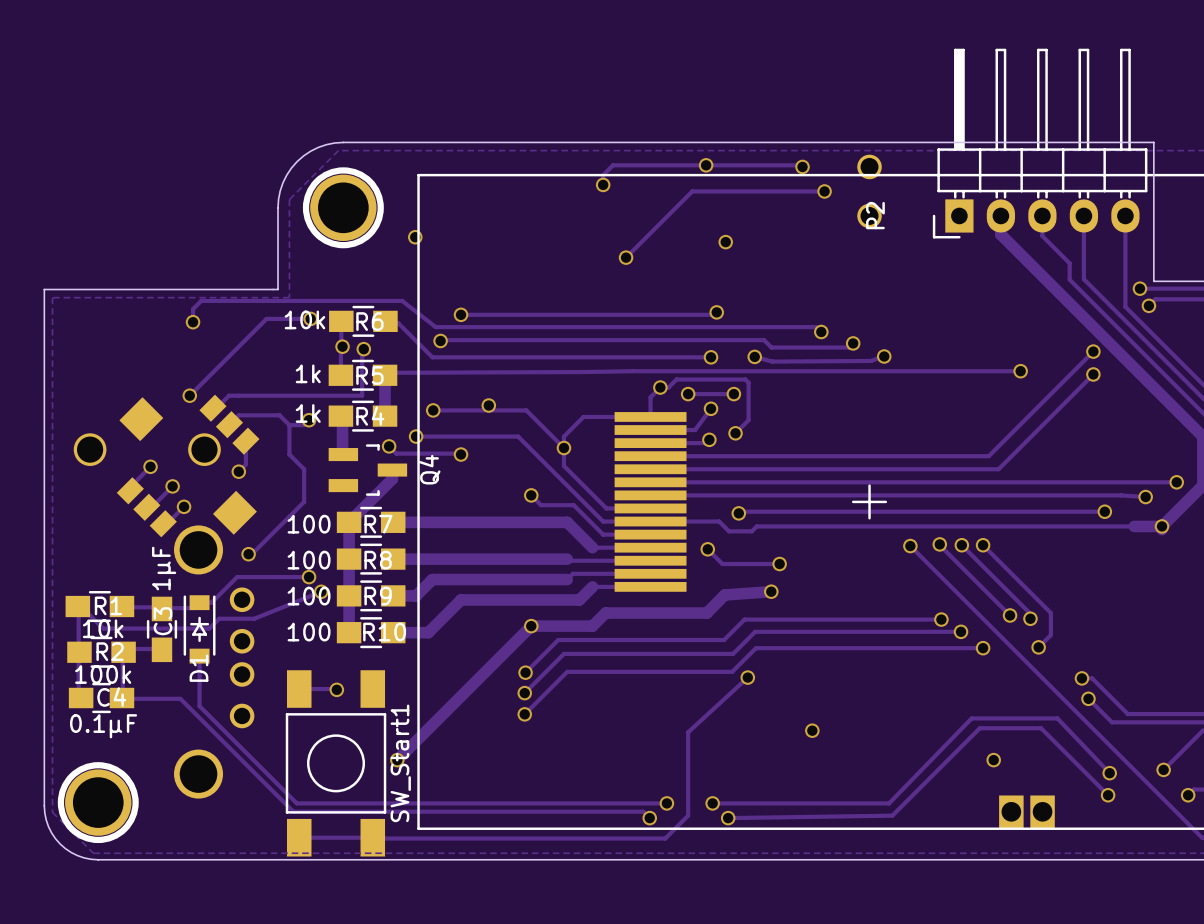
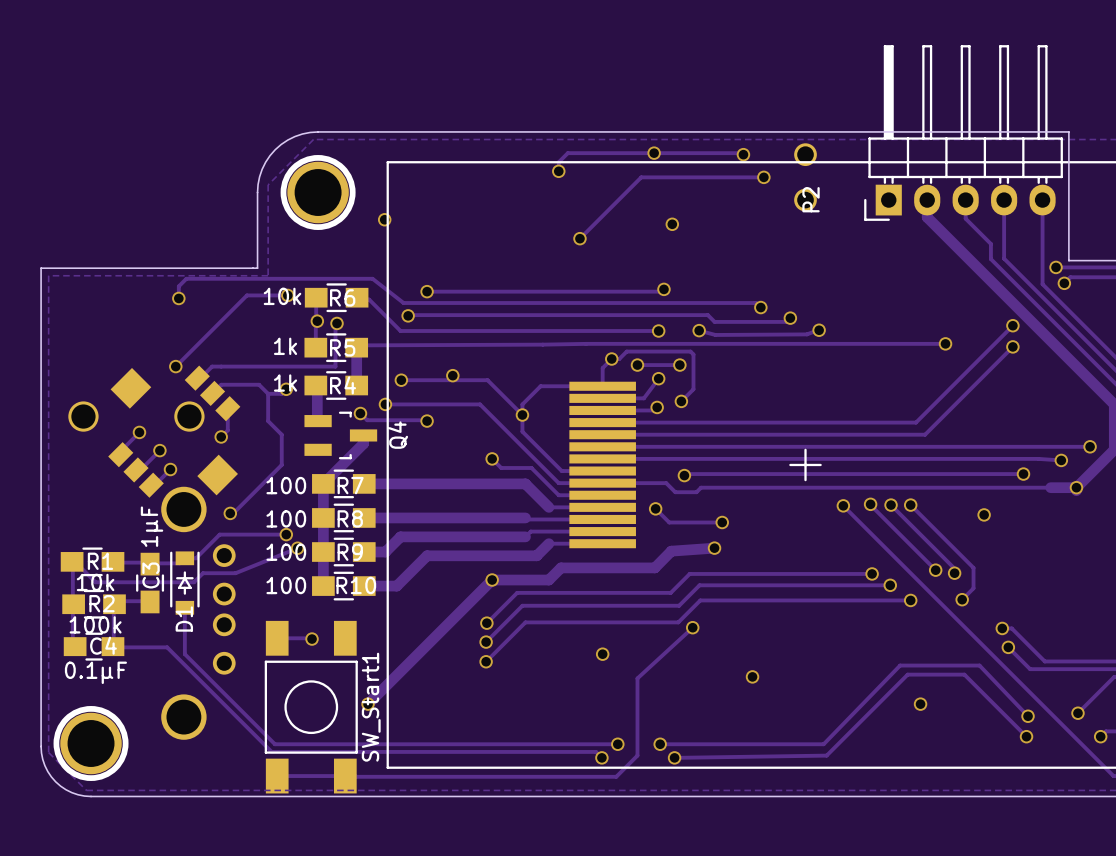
via: none -> (984, 514)
via: none -> (602, 654)
part: (1026, 811) -> none

